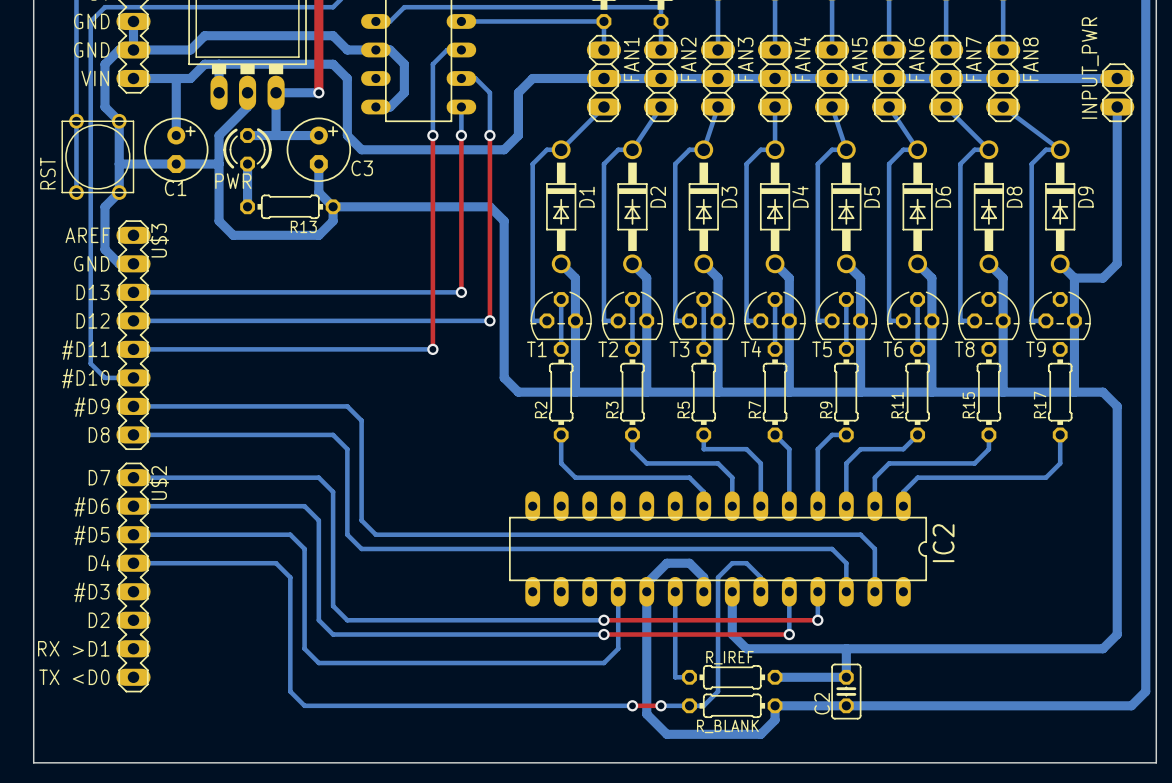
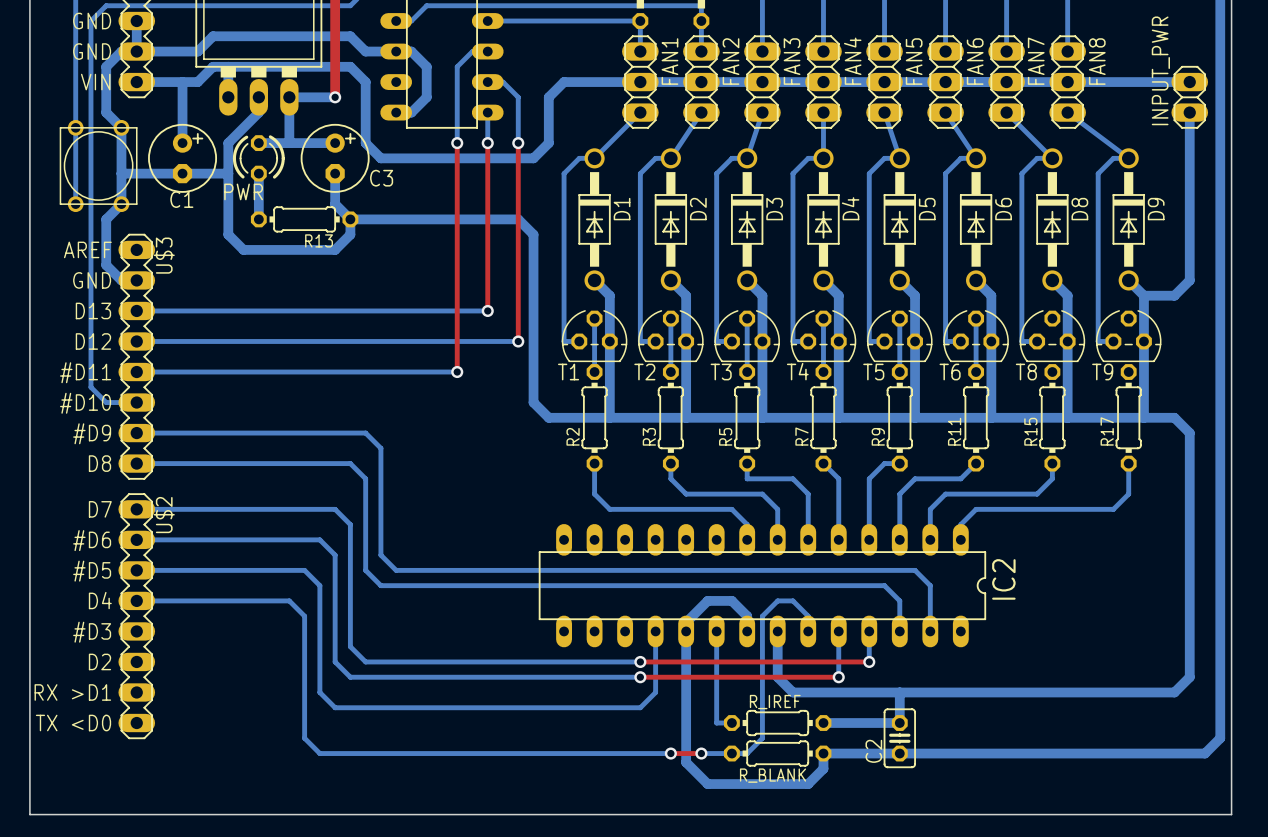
RST name: RST (47, 173) -> none

